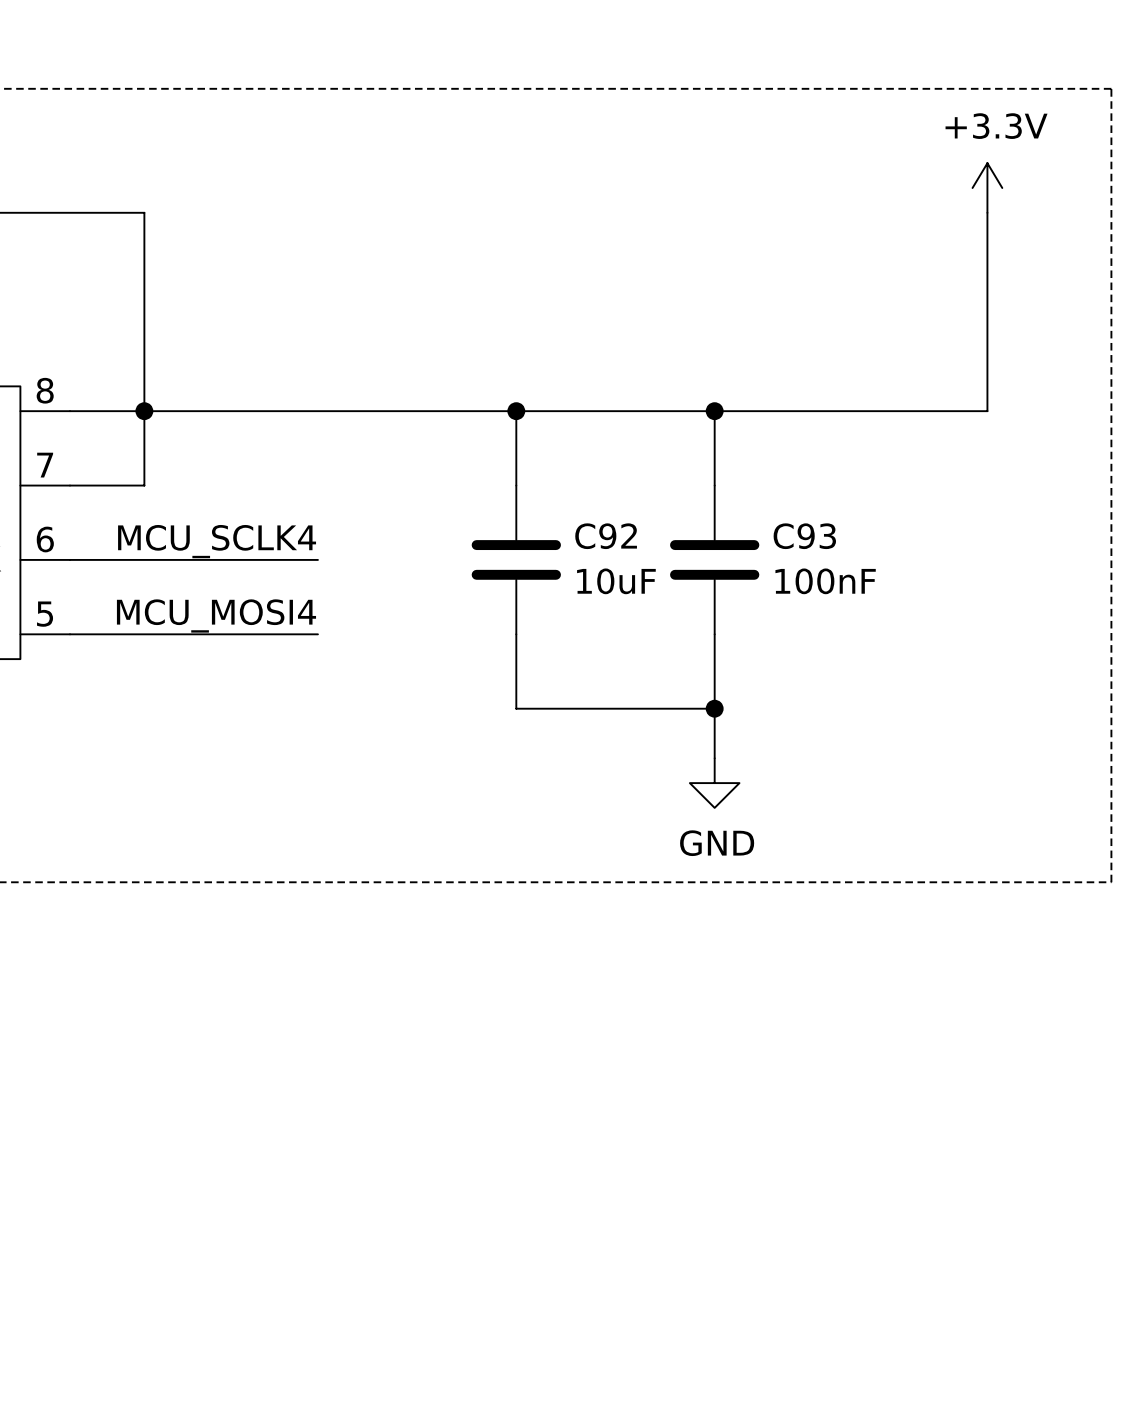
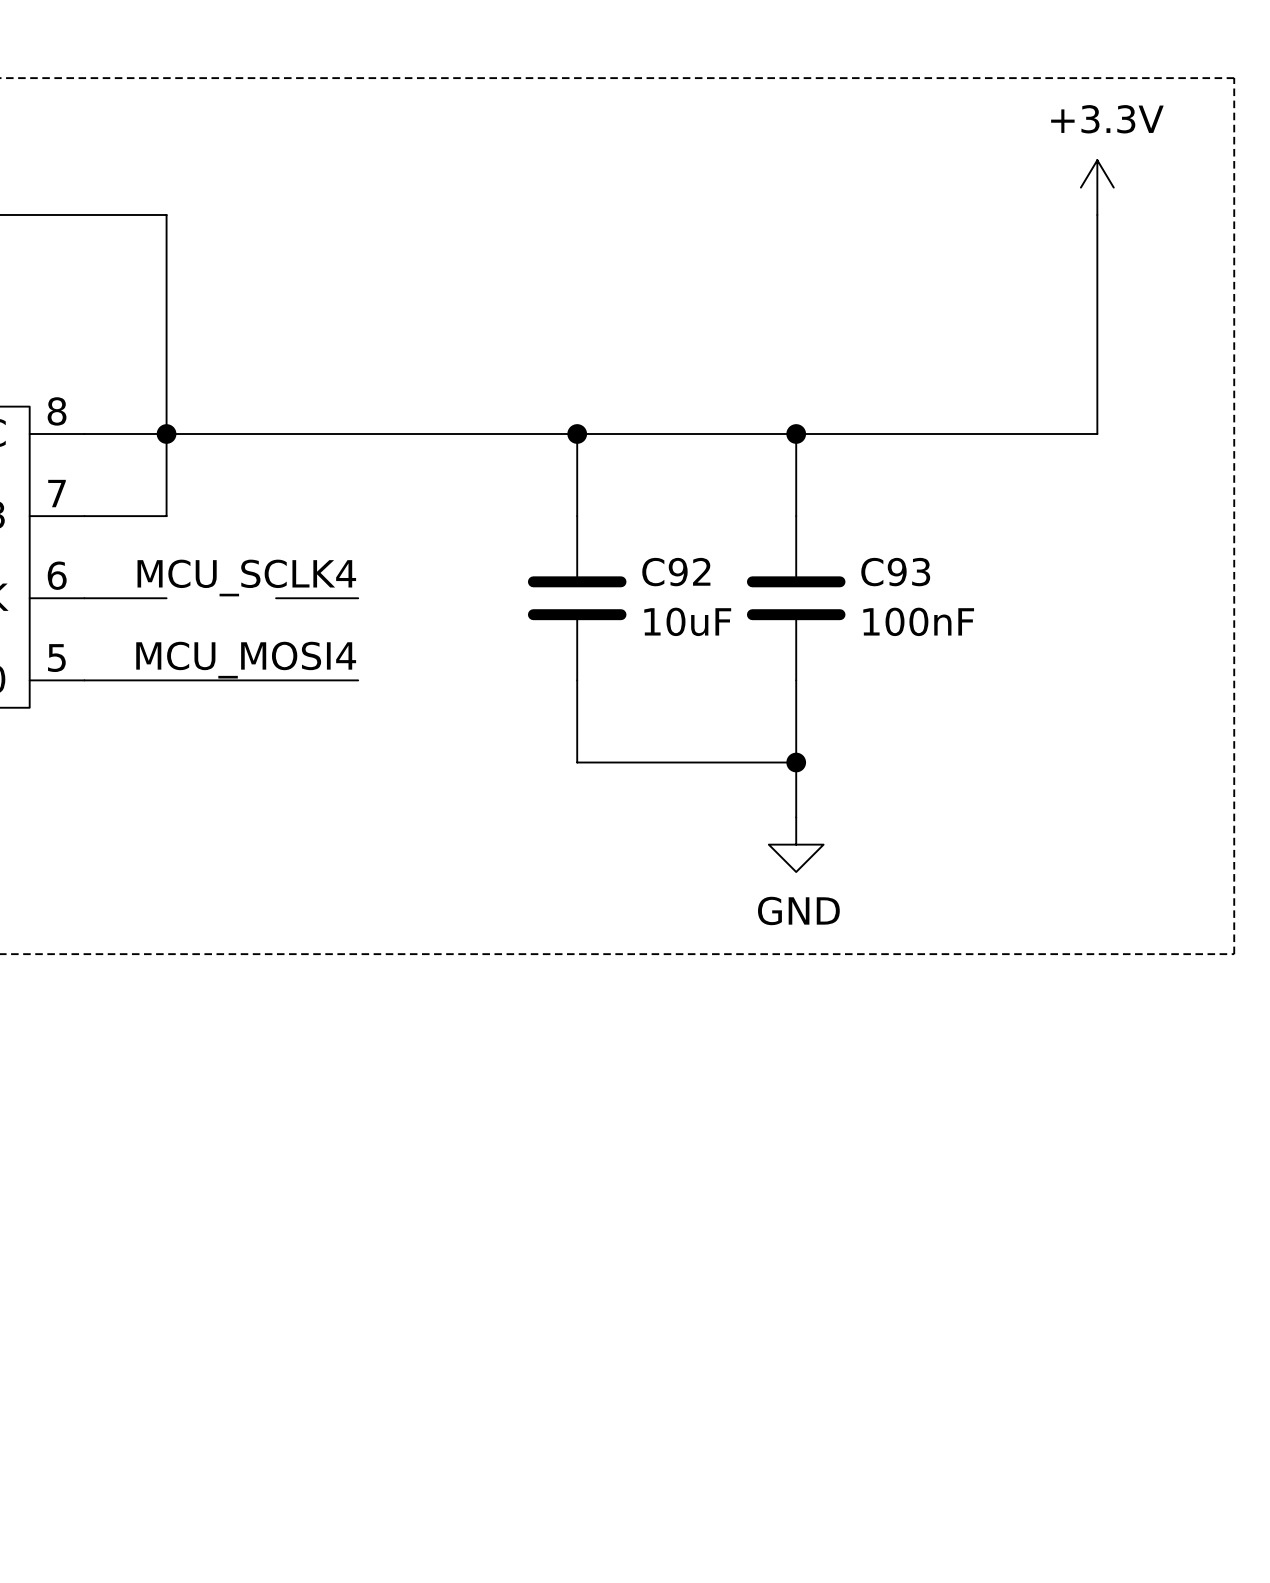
wire: (144, 559) (243, 559) -> none

